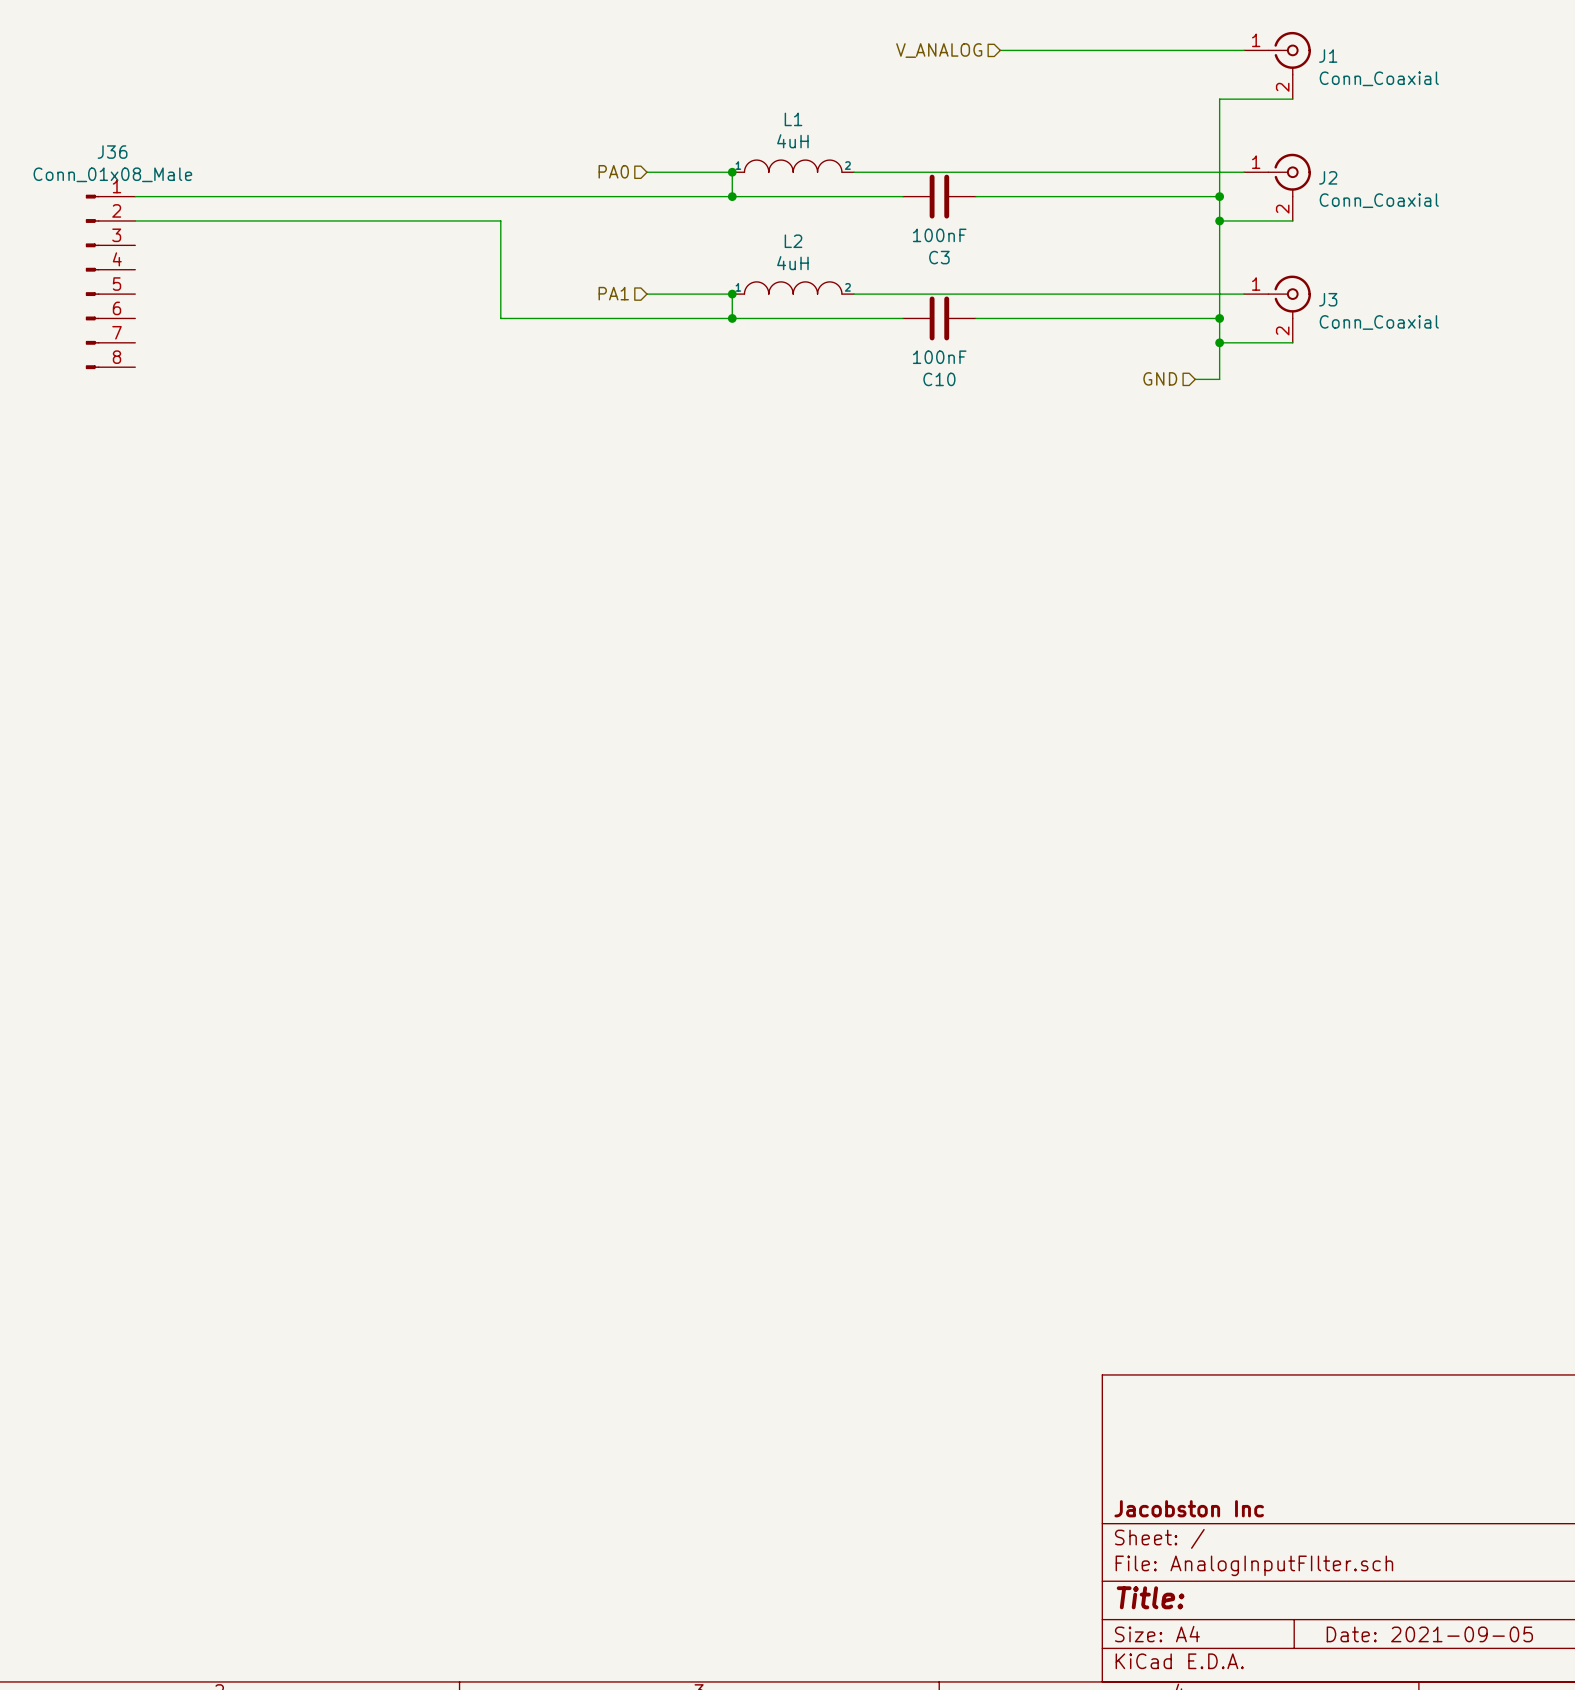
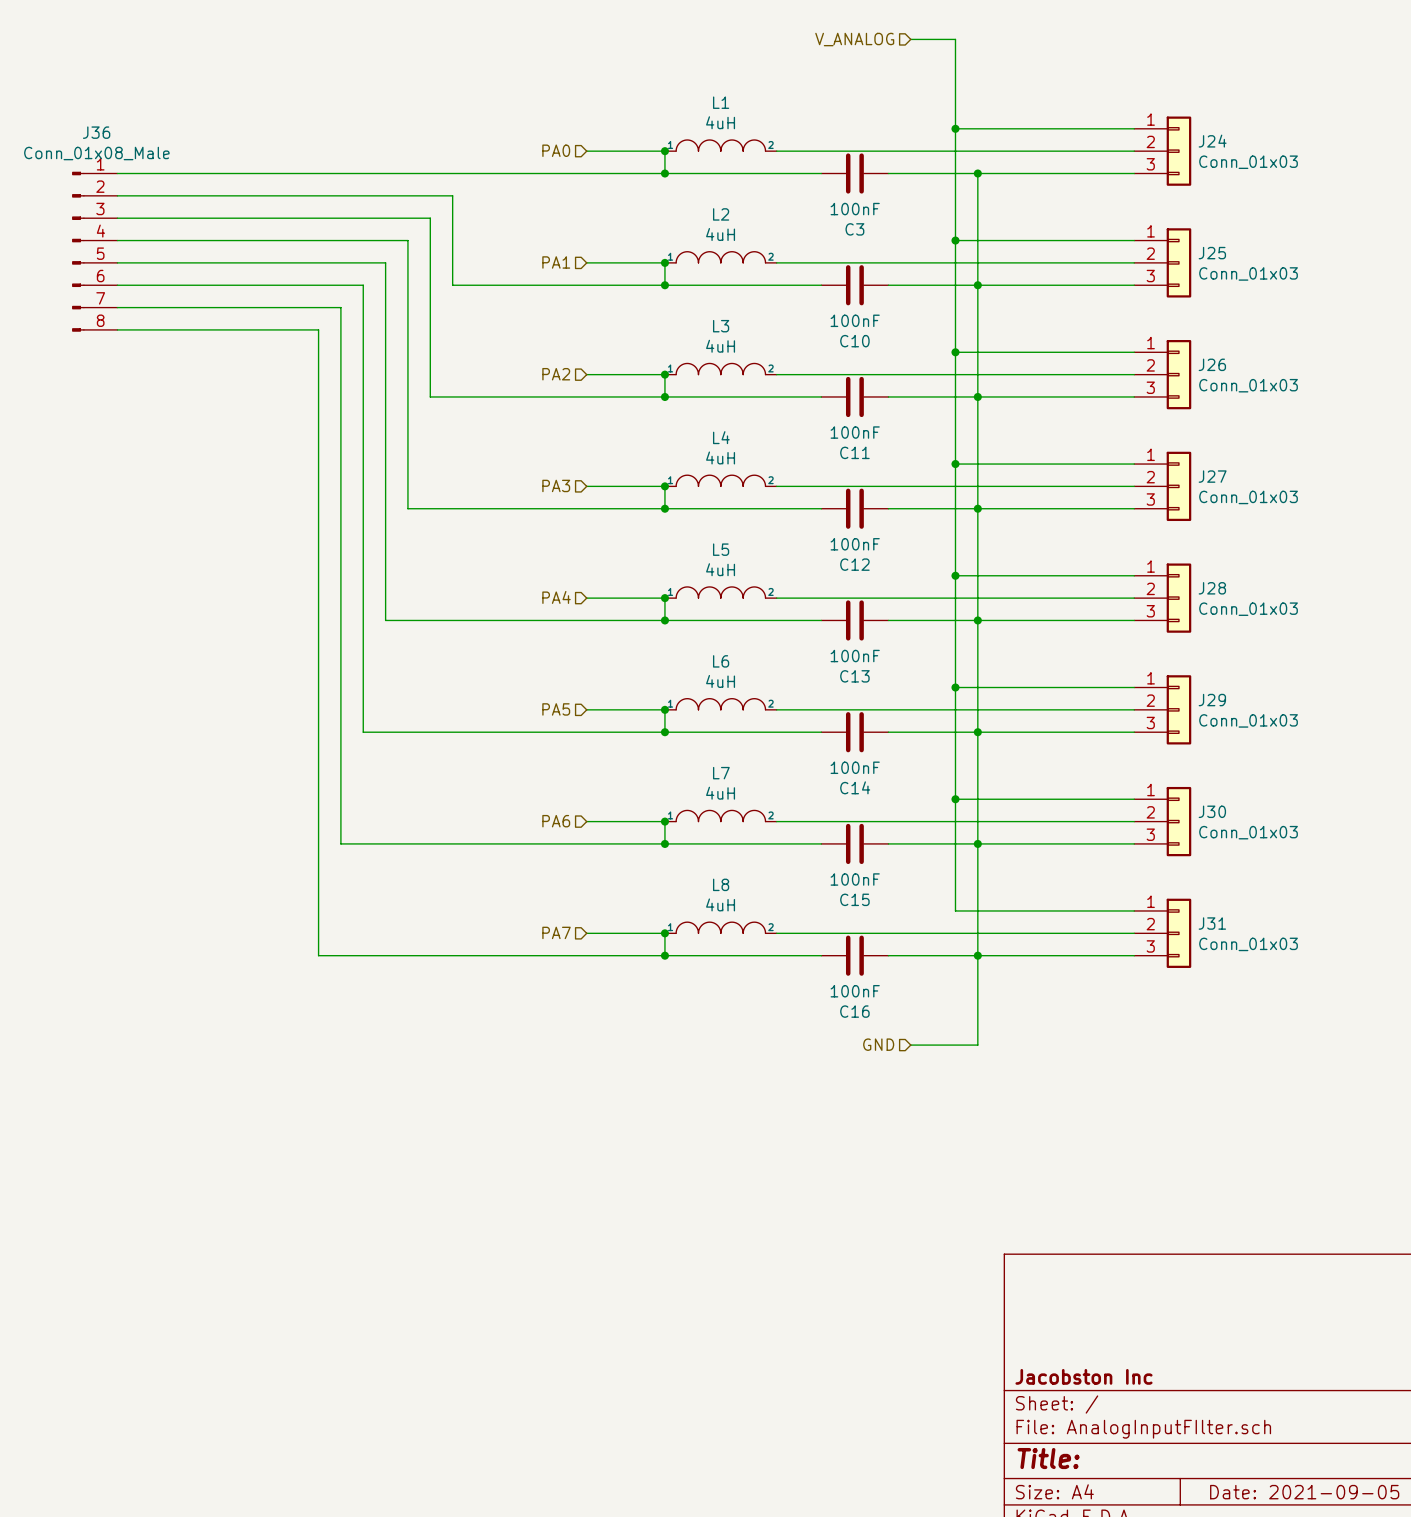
wire: (1049, 50) (1244, 50) -> (955, 39) (955, 910) (1134, 910)
J1: Conn_Coaxial (1277, 65) -> none
wire: (1292, 99) (1219, 99) (1219, 379) (1195, 379) -> none
wire: none -> (955, 128) (1134, 128)
junction: none -> (955, 128)
J24: none -> Conn_01x03 (1162, 151)
J2: Conn_Coaxial (1277, 187) -> none
wire: none -> (977, 173) (977, 1045) (910, 1045)
junction: none -> (977, 173)
wire: none -> (1111, 173) (1134, 173)
junction: (1219, 196) -> none
wire: (1219, 220) (1292, 220) -> none
junction: (1219, 220) -> none
wire: none -> (117, 218) (430, 218) (430, 396) (821, 396)
wire: none -> (117, 240) (407, 240) (407, 508) (821, 508)
wire: none -> (955, 240) (1134, 240)
junction: none -> (955, 240)
wire: none -> (117, 262) (385, 262) (385, 620) (821, 620)
J25: none -> Conn_01x03 (1162, 262)
J3: Conn_Coaxial (1277, 309) -> none
wire: none -> (117, 285) (363, 285) (363, 732) (821, 732)
junction: none -> (977, 285)
wire: none -> (1111, 285) (1134, 285)
junction: (1219, 318) -> none
wire: none -> (117, 307) (340, 307) (340, 843) (821, 843)
wire: (1219, 342) (1292, 342) -> none
junction: (1219, 342) -> none
wire: none -> (117, 329) (318, 329) (318, 955) (821, 955)
hierarchical label: GND (1160, 378) -> none
wire: none -> (955, 352) (1134, 352)
junction: none -> (955, 352)
L3: none -> 4uH (720, 369)
hierarchical label: none -> PA2 (556, 374)
wire: none -> (586, 374) (664, 374) (664, 396)
junction: none -> (664, 374)
wire: none -> (776, 374) (1134, 374)
J26: none -> Conn_01x03 (1162, 374)
junction: none -> (664, 396)
C11: none -> 100nF (854, 396)
wire: none -> (888, 396) (1134, 396)
junction: none -> (977, 396)
wire: none -> (955, 464) (1134, 464)
junction: none -> (955, 464)
L4: none -> 4uH (720, 480)
hierarchical label: none -> PA3 (556, 485)
wire: none -> (586, 486) (664, 486) (664, 508)
junction: none -> (664, 486)
wire: none -> (776, 486) (1134, 486)
J27: none -> Conn_01x03 (1162, 486)
junction: none -> (664, 508)
C12: none -> 100nF (854, 508)
wire: none -> (888, 508) (1134, 508)
junction: none -> (977, 508)
wire: none -> (955, 575) (1134, 575)
junction: none -> (955, 575)
L5: none -> 4uH (720, 592)
hierarchical label: none -> PA4 (556, 597)
wire: none -> (586, 598) (664, 598) (664, 620)
junction: none -> (664, 598)
wire: none -> (776, 598) (1134, 598)
J28: none -> Conn_01x03 (1162, 598)
junction: none -> (664, 620)
C13: none -> 100nF (854, 620)
wire: none -> (888, 620) (1134, 620)
junction: none -> (977, 620)
wire: none -> (955, 687) (1134, 687)
junction: none -> (955, 687)
L6: none -> 4uH (720, 704)
hierarchical label: none -> PA5 (556, 709)
wire: none -> (586, 709) (664, 709) (664, 732)
junction: none -> (664, 709)
wire: none -> (776, 709) (1134, 709)
J29: none -> Conn_01x03 (1162, 709)
junction: none -> (664, 732)
C14: none -> 100nF (854, 732)
wire: none -> (888, 732) (1134, 732)
junction: none -> (977, 732)
wire: none -> (955, 799) (1134, 799)
junction: none -> (955, 799)
L7: none -> 4uH (720, 816)
hierarchical label: none -> PA6 (556, 821)
wire: none -> (586, 821) (664, 821) (664, 843)
junction: none -> (664, 821)
wire: none -> (776, 821) (1134, 821)
J30: none -> Conn_01x03 (1162, 821)
junction: none -> (664, 843)
C15: none -> 100nF (854, 843)
wire: none -> (888, 843) (1134, 843)
junction: none -> (977, 843)
L8: none -> 4uH (720, 927)
hierarchical label: none -> PA7 (556, 932)
wire: none -> (586, 933) (664, 933) (664, 955)
junction: none -> (664, 933)
wire: none -> (776, 933) (1134, 933)
J31: none -> Conn_01x03 (1162, 933)
junction: none -> (664, 955)
C16: none -> 100nF (854, 955)
wire: none -> (888, 955) (1134, 955)
junction: none -> (977, 955)
hierarchical label: none -> GND (878, 1044)

